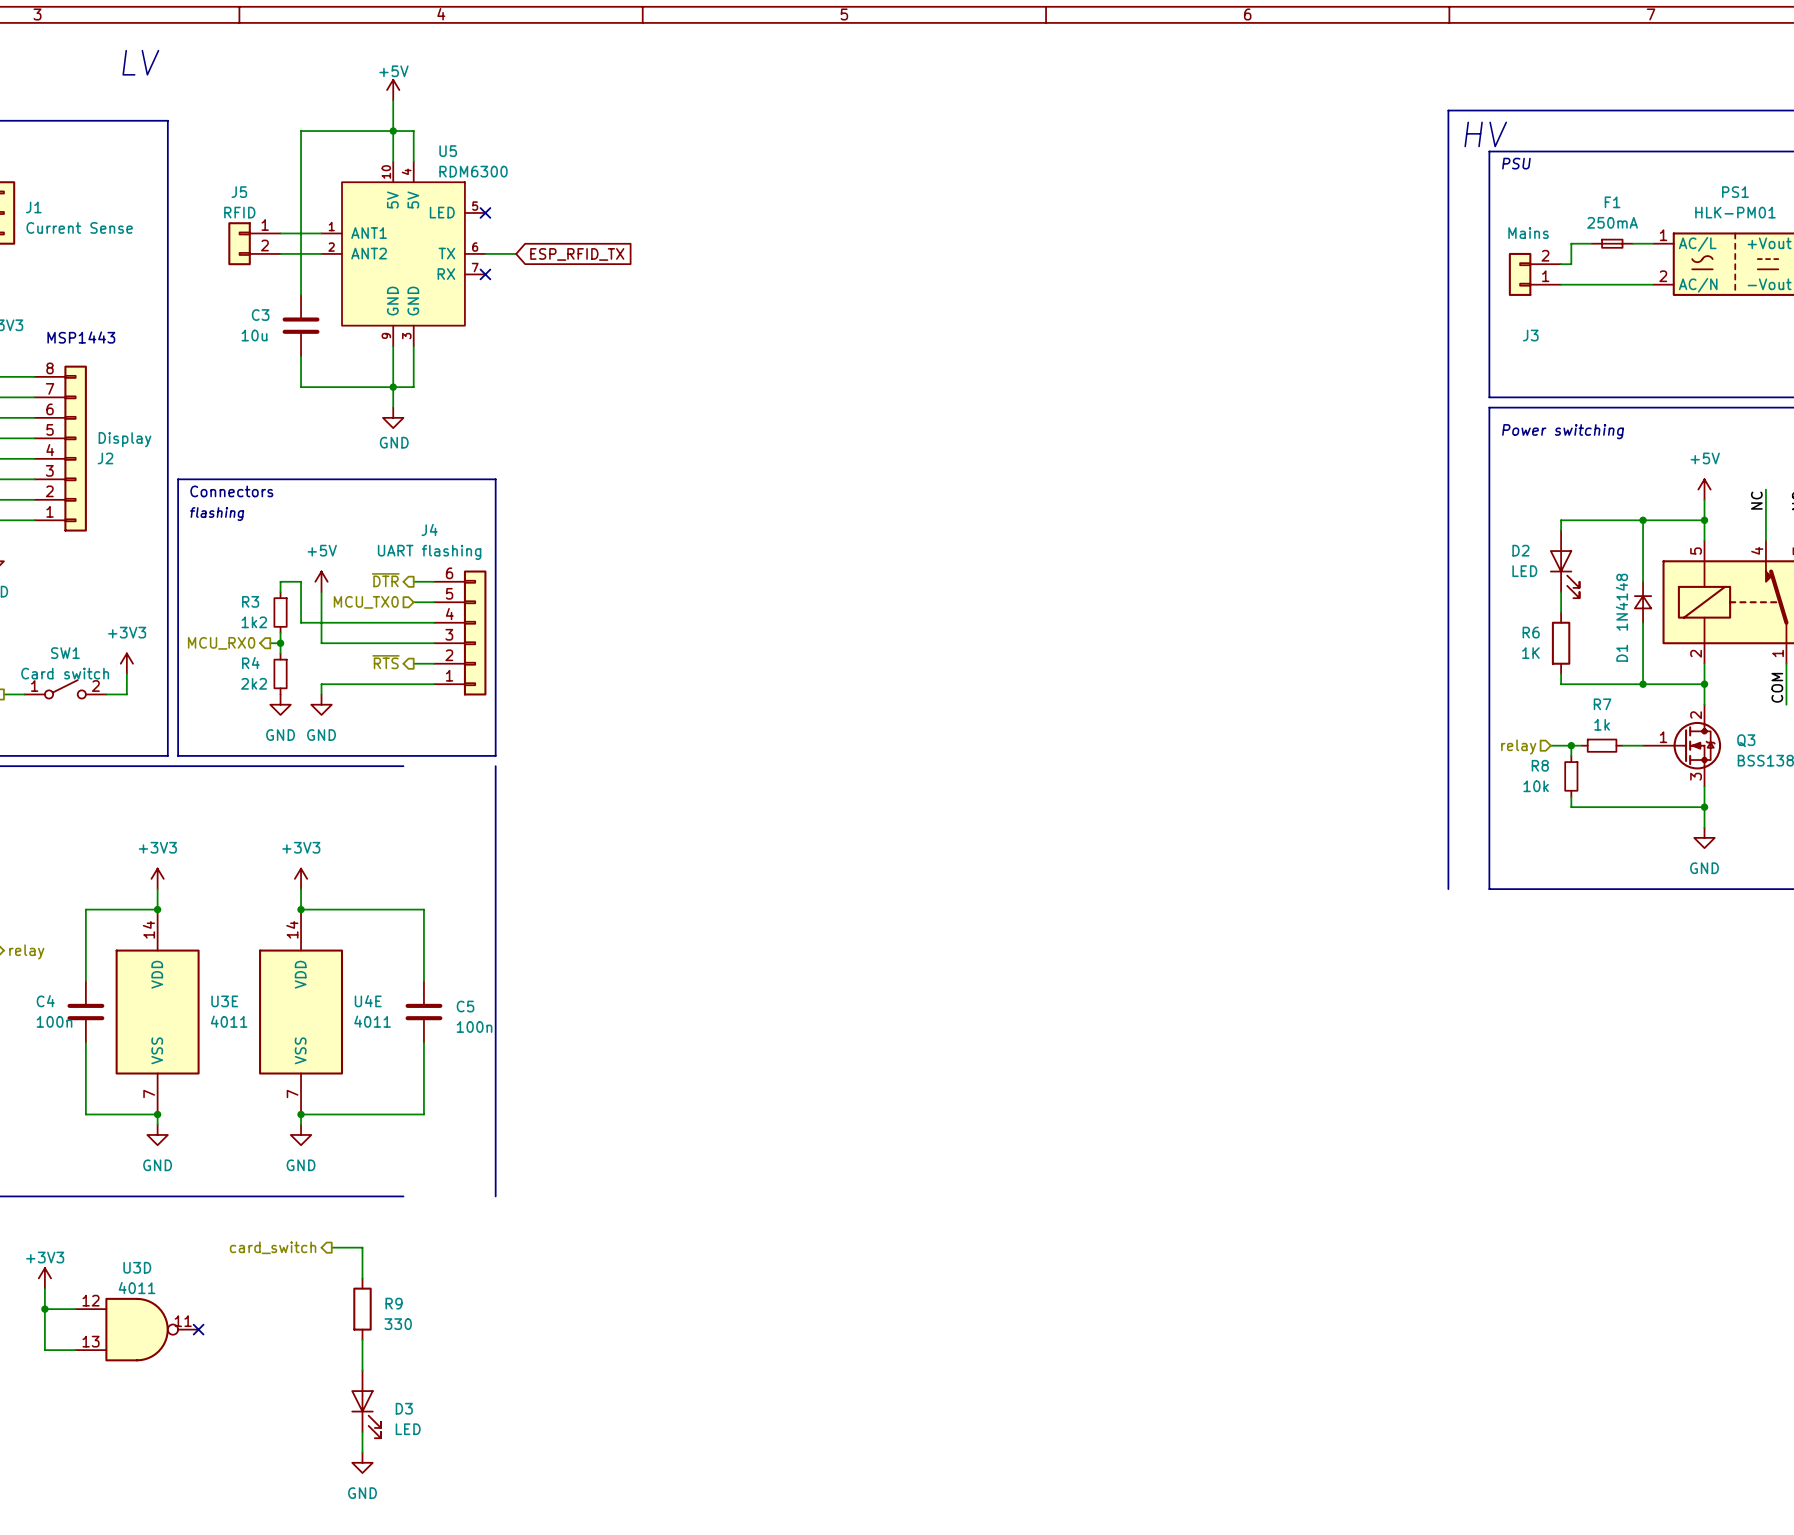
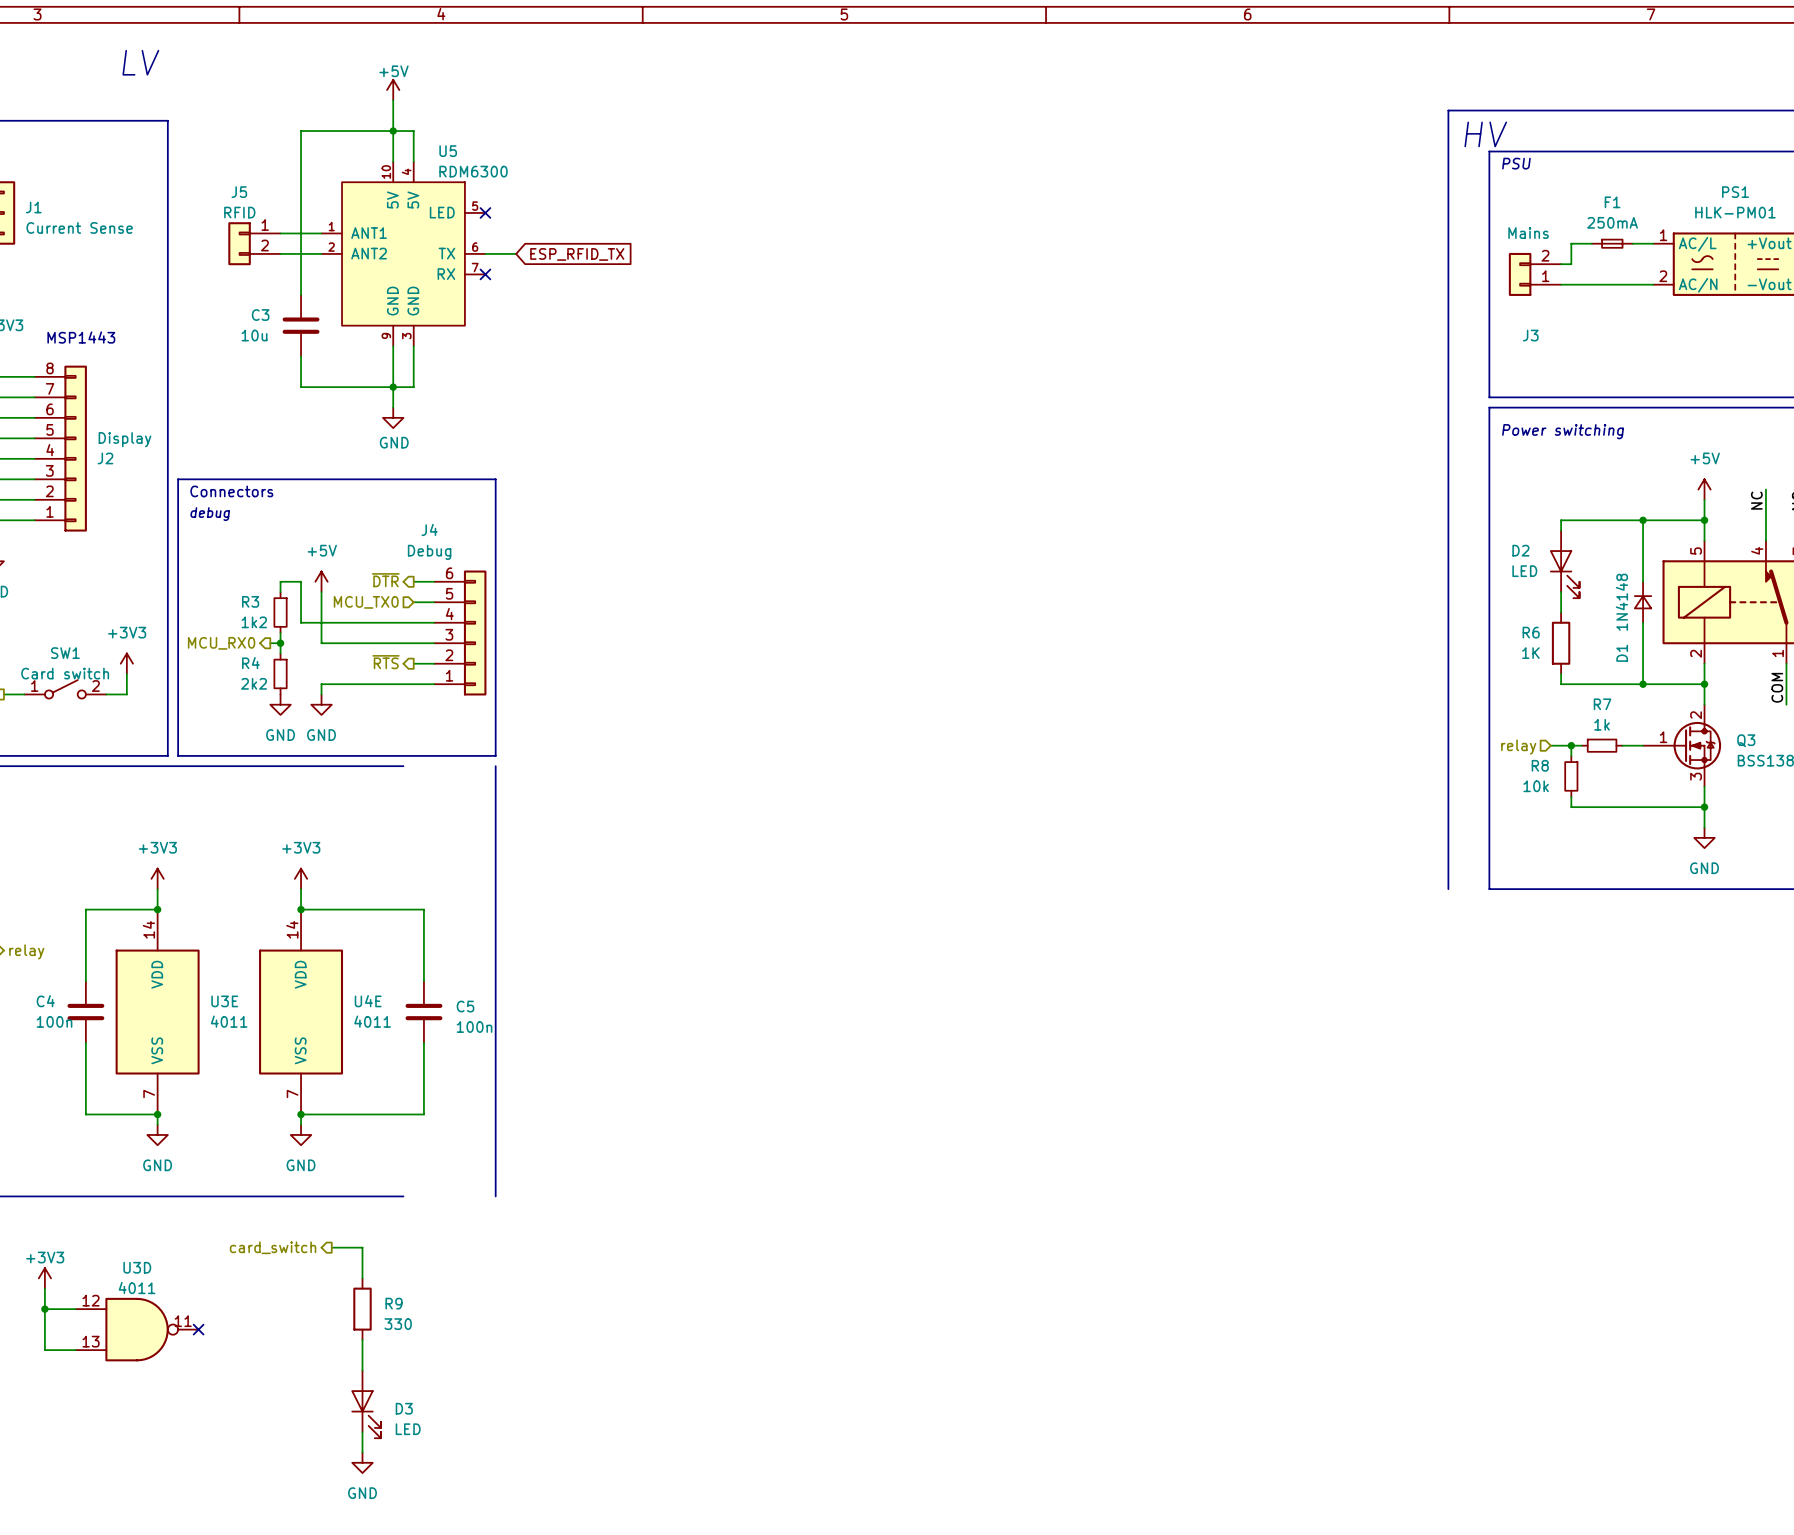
text: flashing (217, 514) -> debug (210, 514)
J4 value: UART flashing (429, 552) -> Debug (429, 552)

